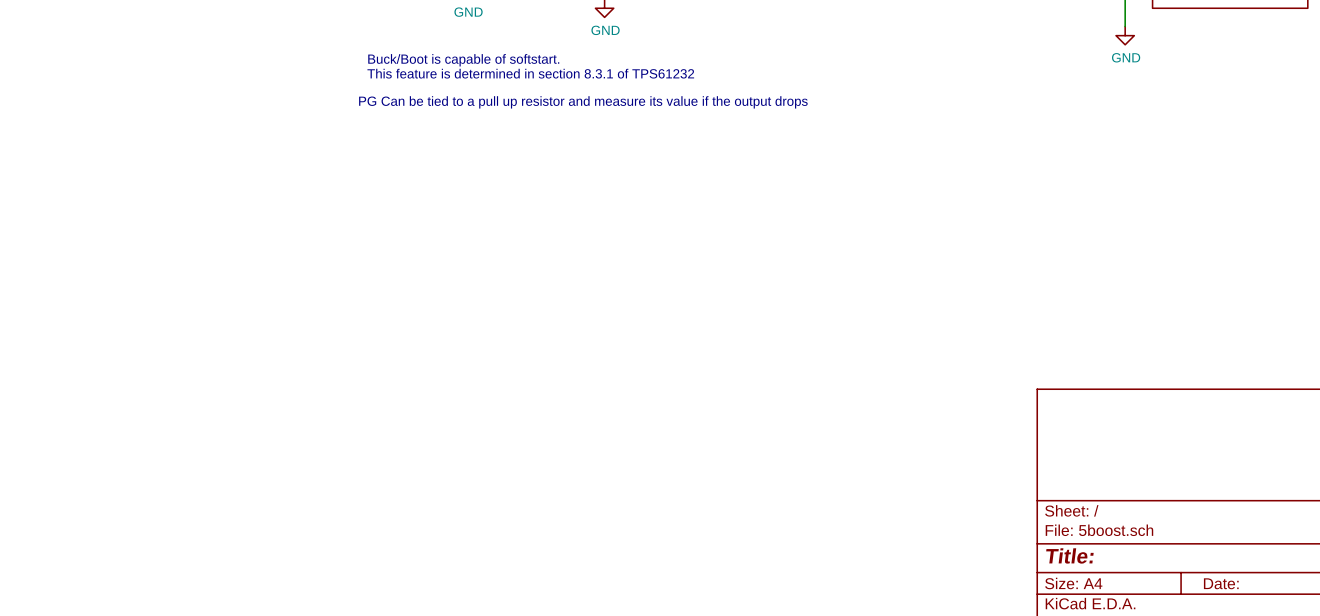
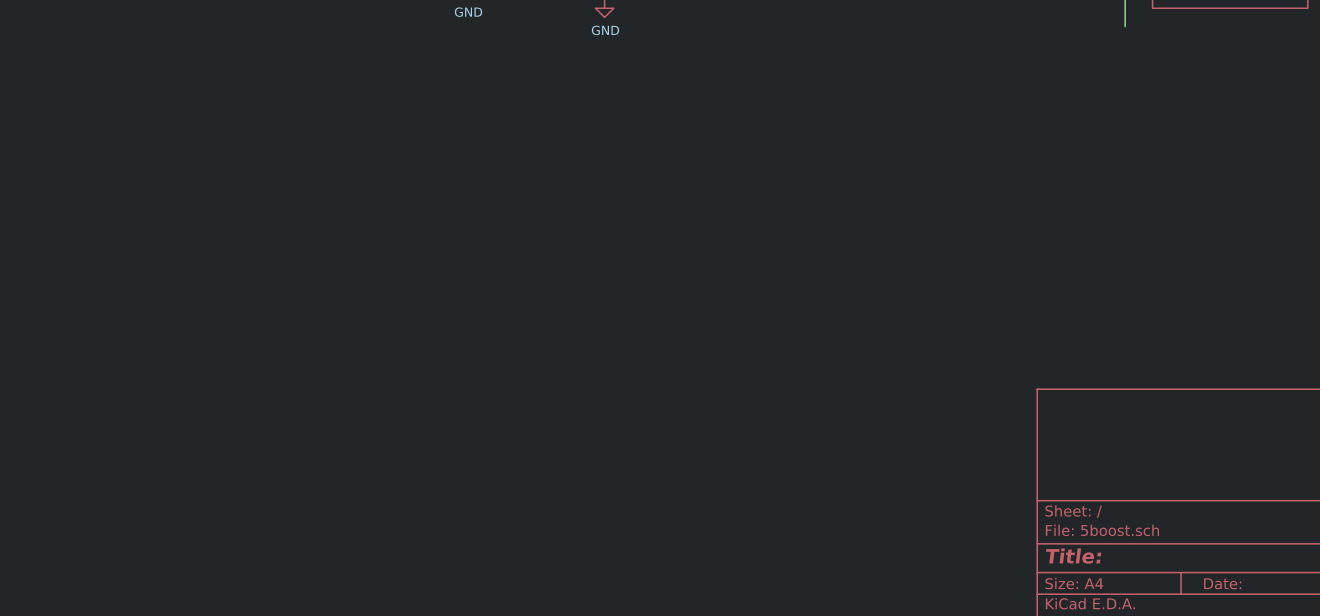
power symbol: GND (1125, 35) -> none
text: Buck/Boot is capable of softstart. (463, 60) -> none
text: This feature is determined in section 8.3.1 of TPS61232 (530, 73) -> none
text: PG Can be tied to a pull up resistor and measure its value if the output drops (583, 102) -> none

